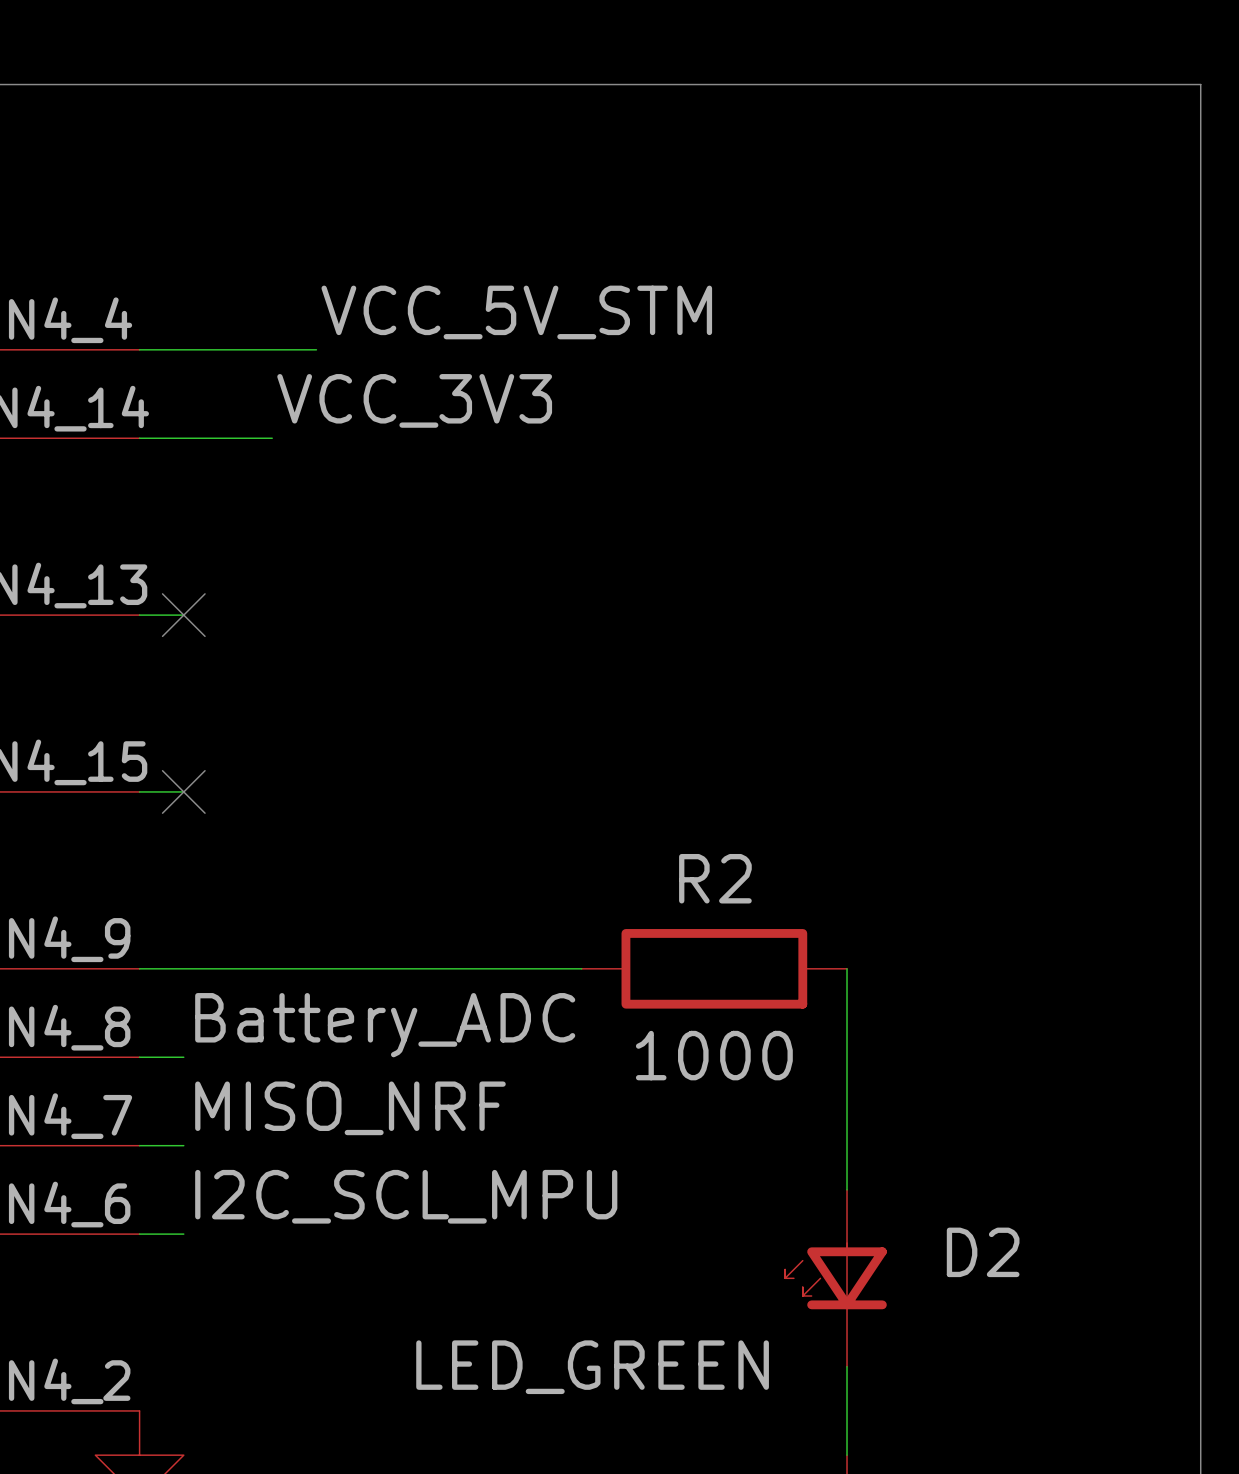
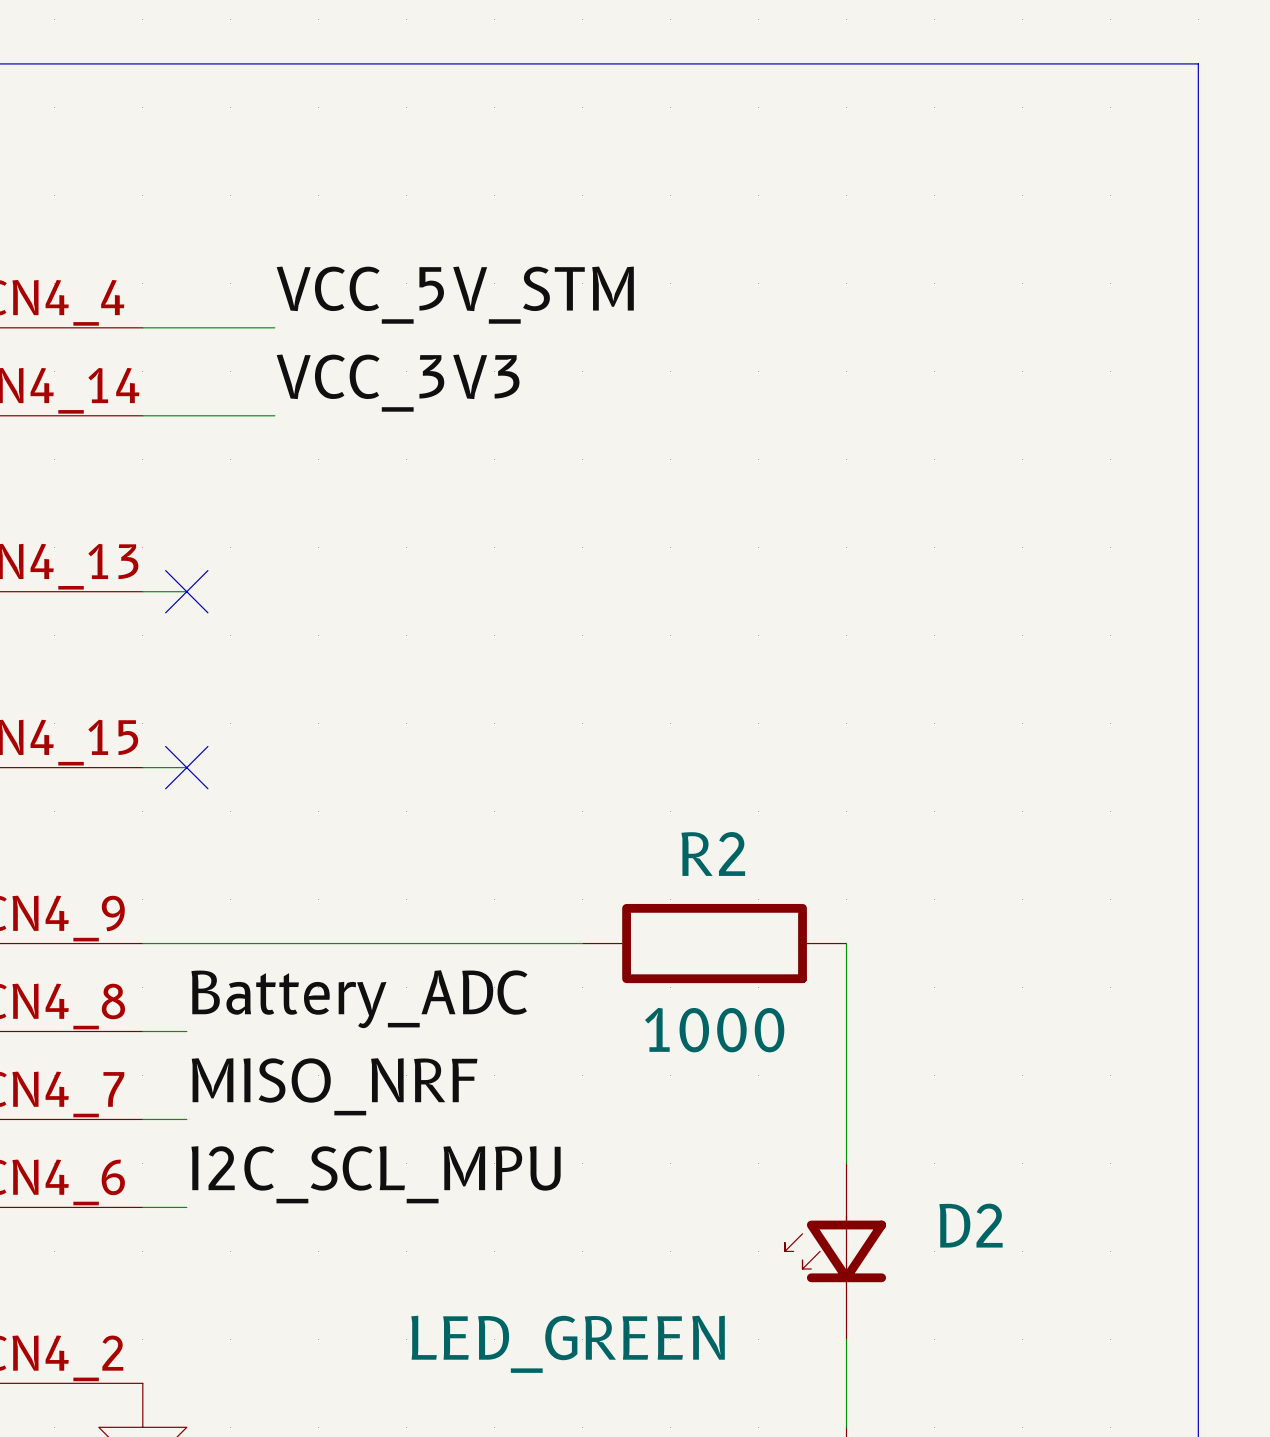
label position: VCC_5V_STM (516, 312) -> VCC_5V_STM (455, 295)
wire: (272, 349) (316, 349) -> none

